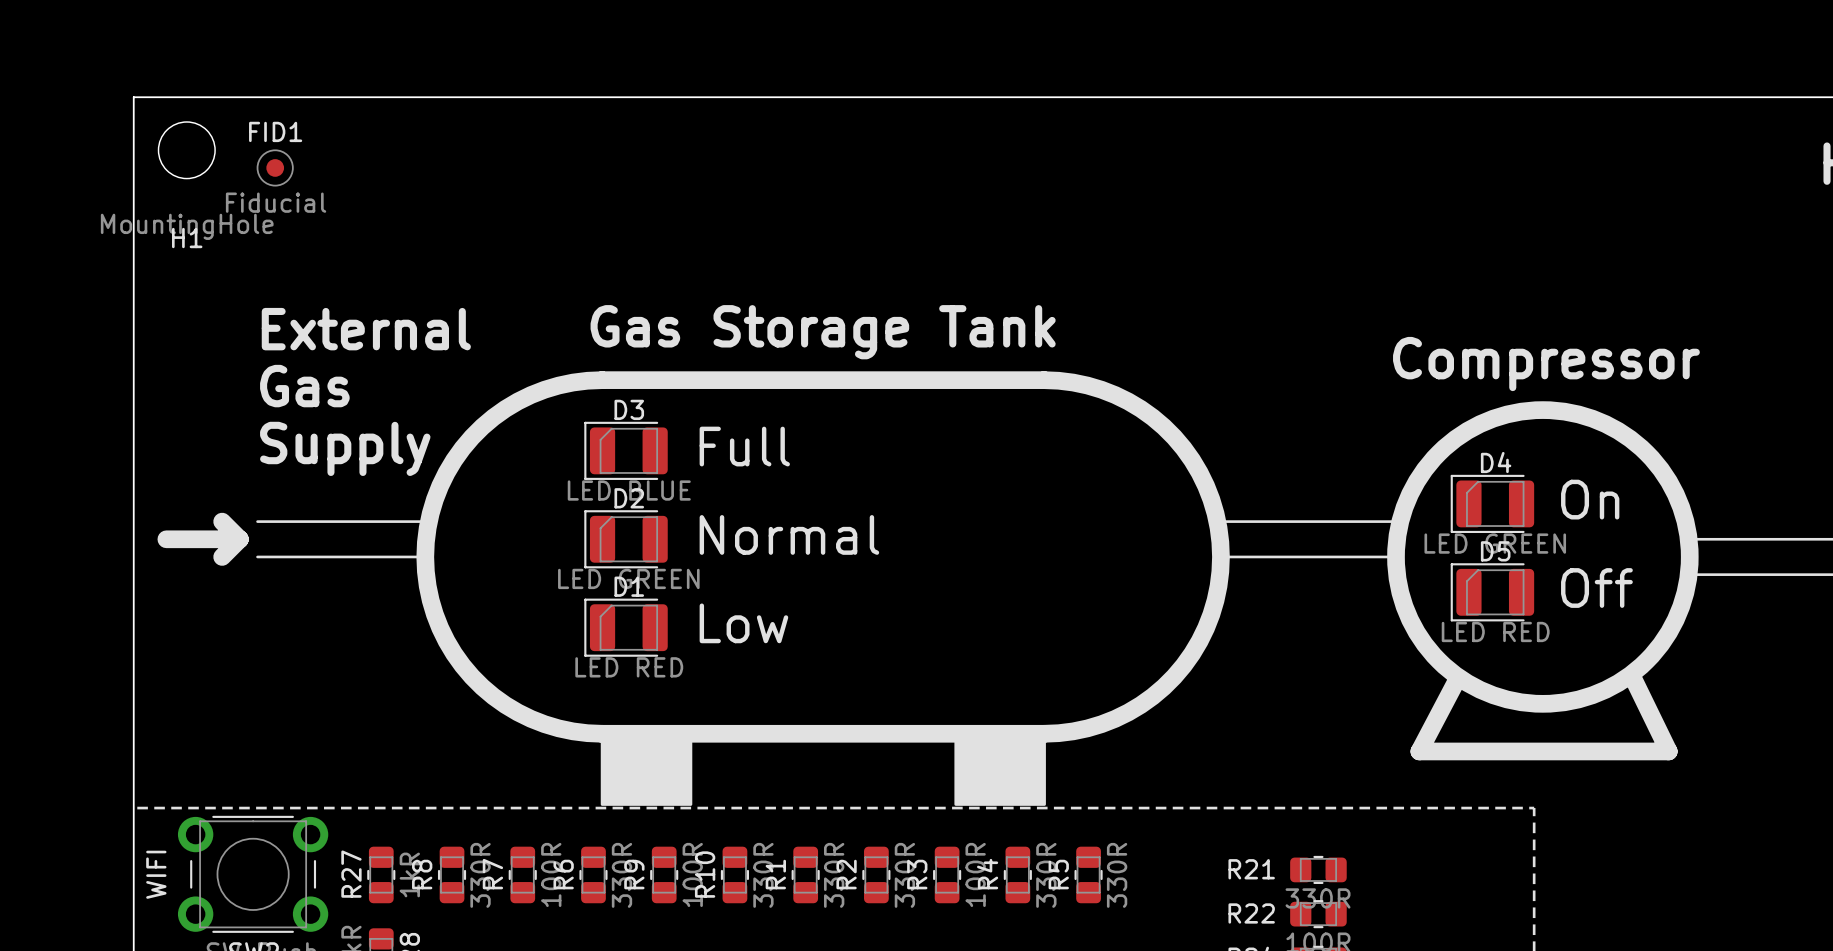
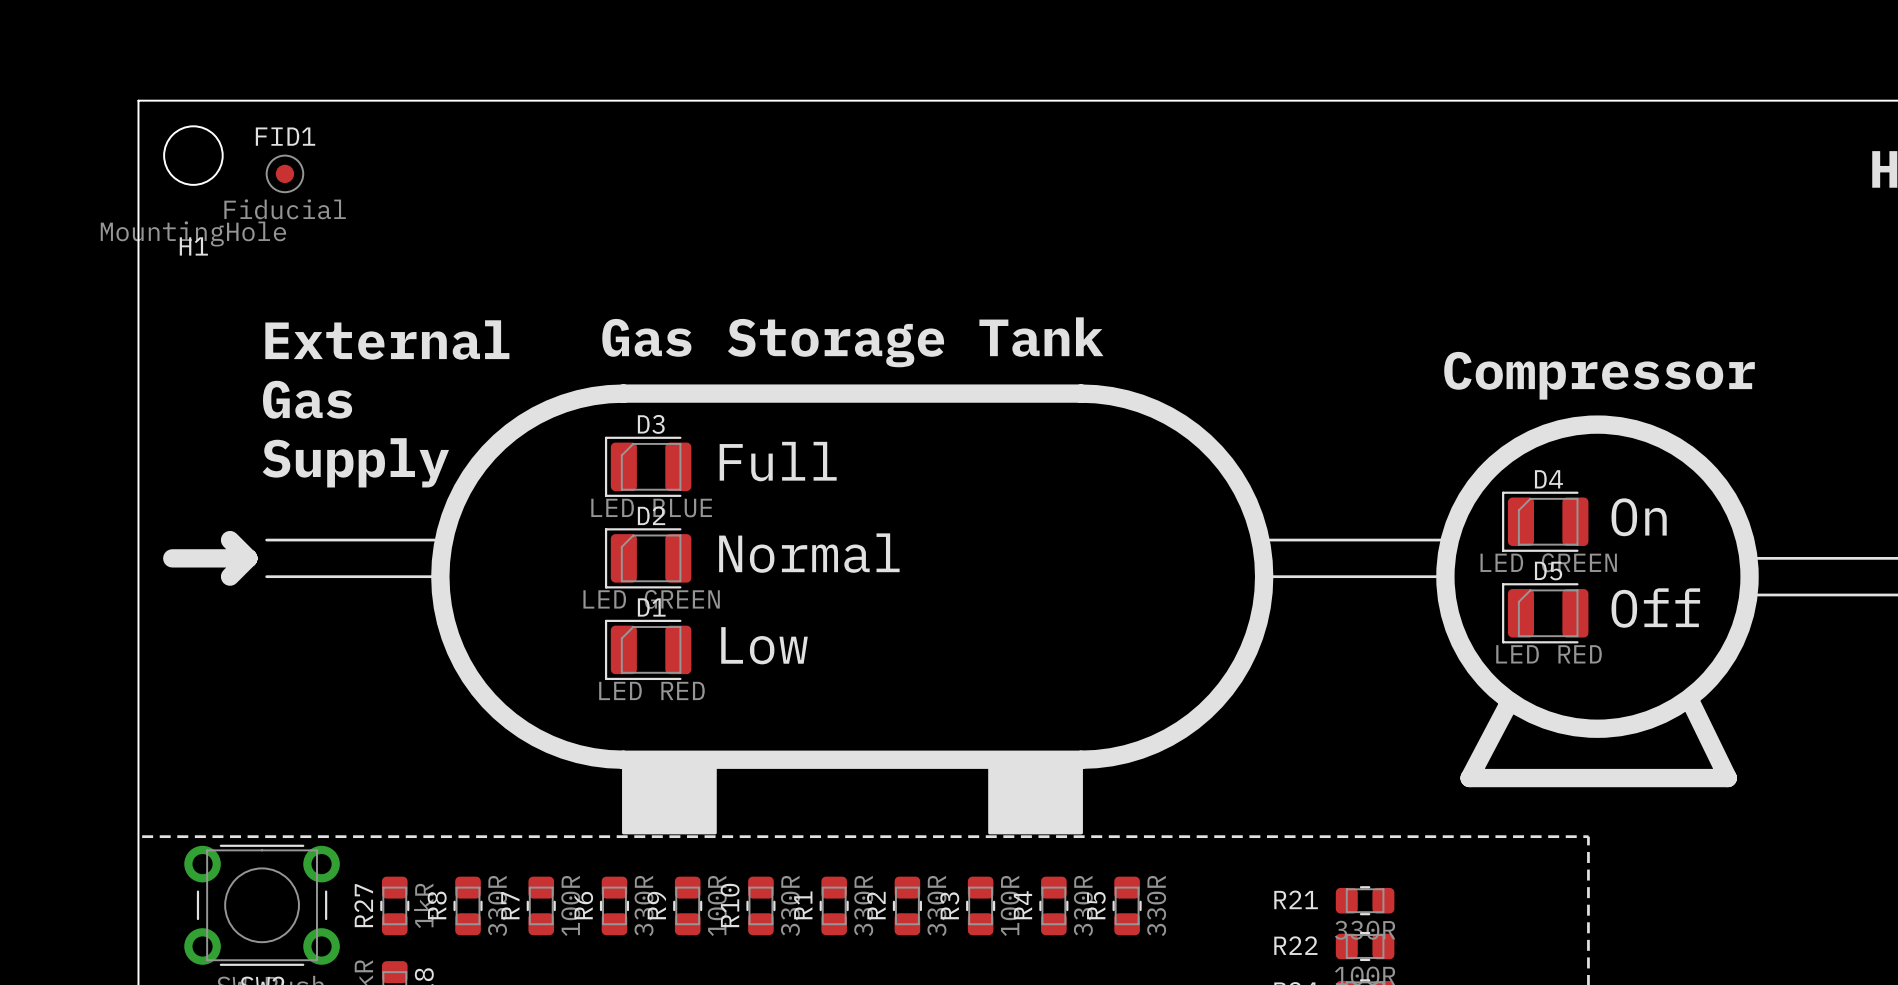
text: WIFI (156, 874) -> none

